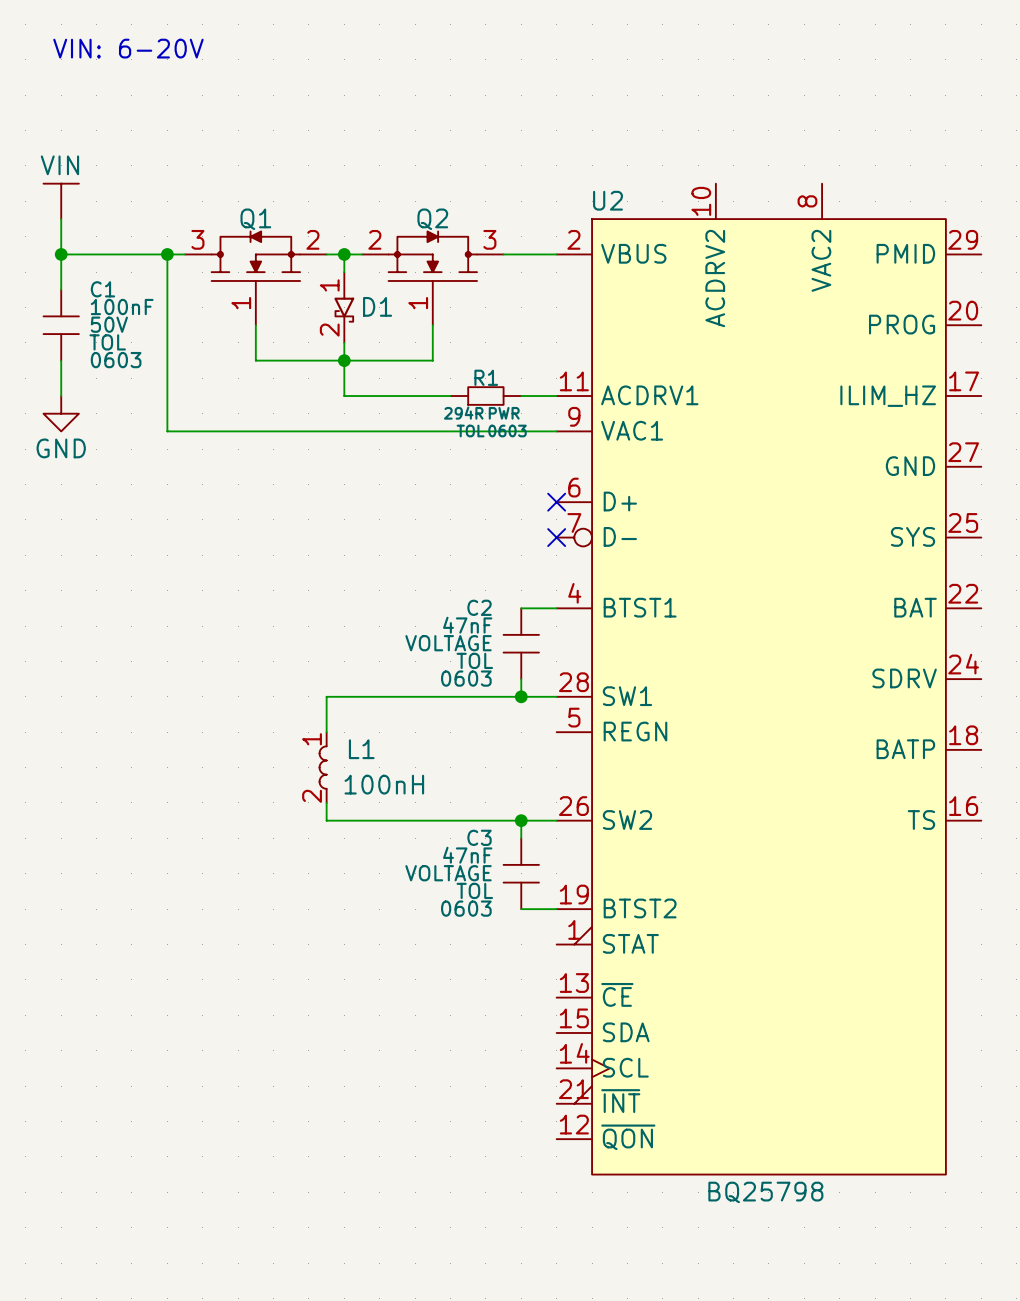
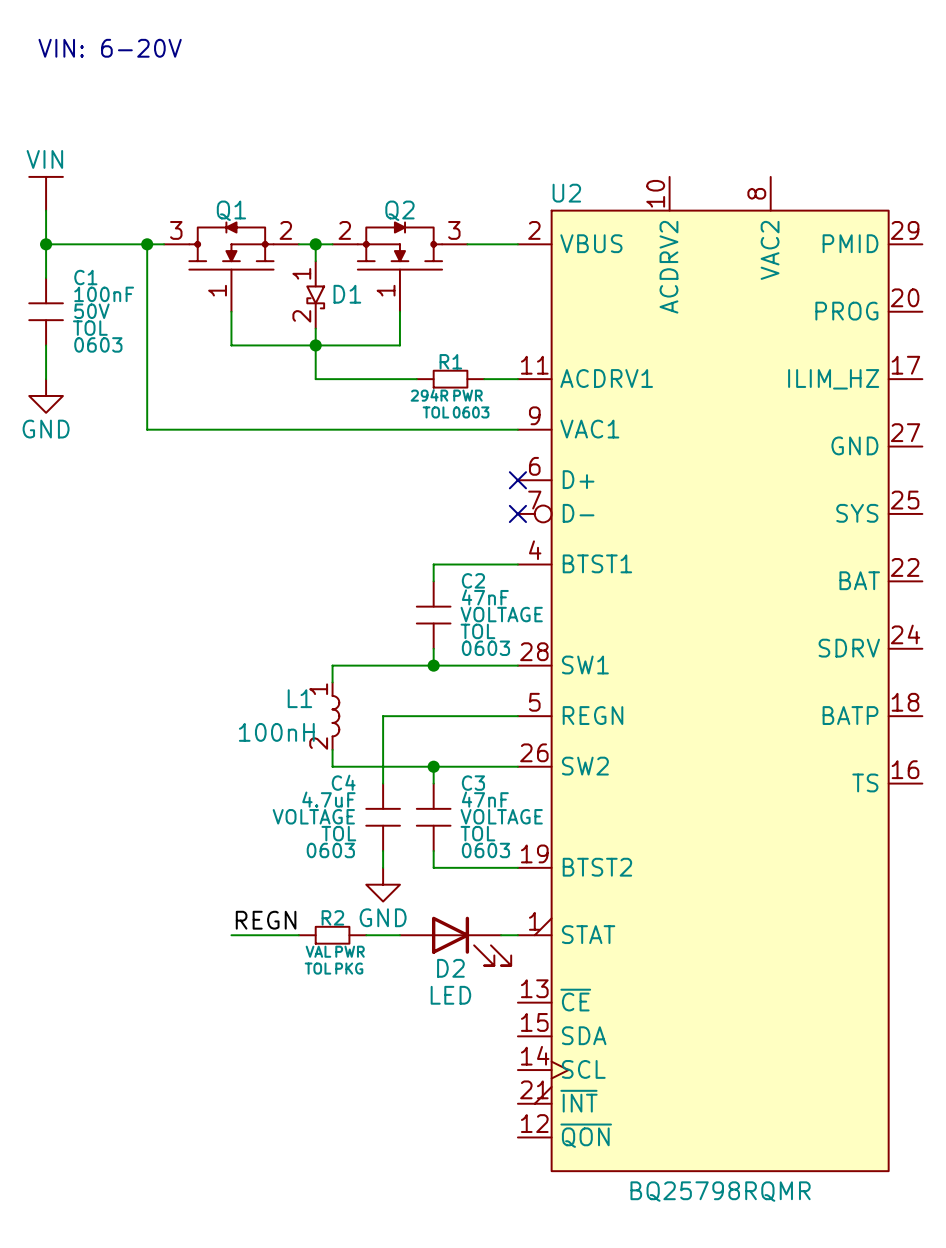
U2 symbol: [556, 183, 982, 1175] -> [517, 176, 923, 1172]
wire: (167, 431) (556, 431) -> (147, 412) (147, 429) (517, 429)
wire: none -> (517, 564) (433, 564) (433, 581)
C2 name position: C2 (479, 607) -> C2 (473, 580)
wire: (521, 608) (556, 608) -> none
C2 value position: 47nF (467, 625) -> 47nF (485, 597)
C2 text position: VOLTAGE (448, 643) -> VOLTAGE (501, 614)
C2 position: (521, 643) -> (433, 615)
C2 text position: TOL (474, 660) -> TOL (477, 631)
C2 text position: 0603 (466, 678) -> 0603 (485, 648)
wire: (521, 679) (521, 696) -> (433, 648) (433, 665)
wire: (362, 696) (326, 696) (326, 732) -> (332, 665) (332, 682)
junction position: (521, 696) -> (433, 665)
wire: none -> (517, 716) (383, 716) (383, 783)
L1 flip: as is (323, 767) -> left-right (335, 716)
L1 position: (323, 767) -> (335, 716)
wire: none -> (332, 749) (332, 766) (517, 766)
wire: (326, 802) (326, 820) (556, 820) -> none
wire: (521, 820) (521, 838) -> (433, 766) (433, 783)
junction position: (521, 820) -> (433, 766)
C3 name position: C3 (479, 837) -> C3 (473, 783)
C3 value position: 47nF (467, 855) -> 47nF (485, 799)
C4: none -> 4.7uF (383, 817)
C3 text position: VOLTAGE (448, 873) -> VOLTAGE (501, 816)
C3 position: (521, 873) -> (433, 817)
C3 text position: TOL (474, 890) -> TOL (477, 833)
wire: none -> (383, 850) (383, 867)
wire: none -> (433, 850) (433, 867) (484, 867)
C3 text position: 0603 (466, 908) -> 0603 (485, 850)
power symbol: none -> GND (383, 884)
label: none -> REGN (266, 920)
wire: none -> (231, 935) (298, 935)
R2: none -> VAL (332, 935)
wire: none -> (366, 935) (399, 935)
wire: none -> (501, 935) (517, 935)
D2: none -> LED (455, 941)
U2 text: BQ25798 (765, 1192) -> none
U2 value: none -> BQ25798RQMR (720, 1191)

